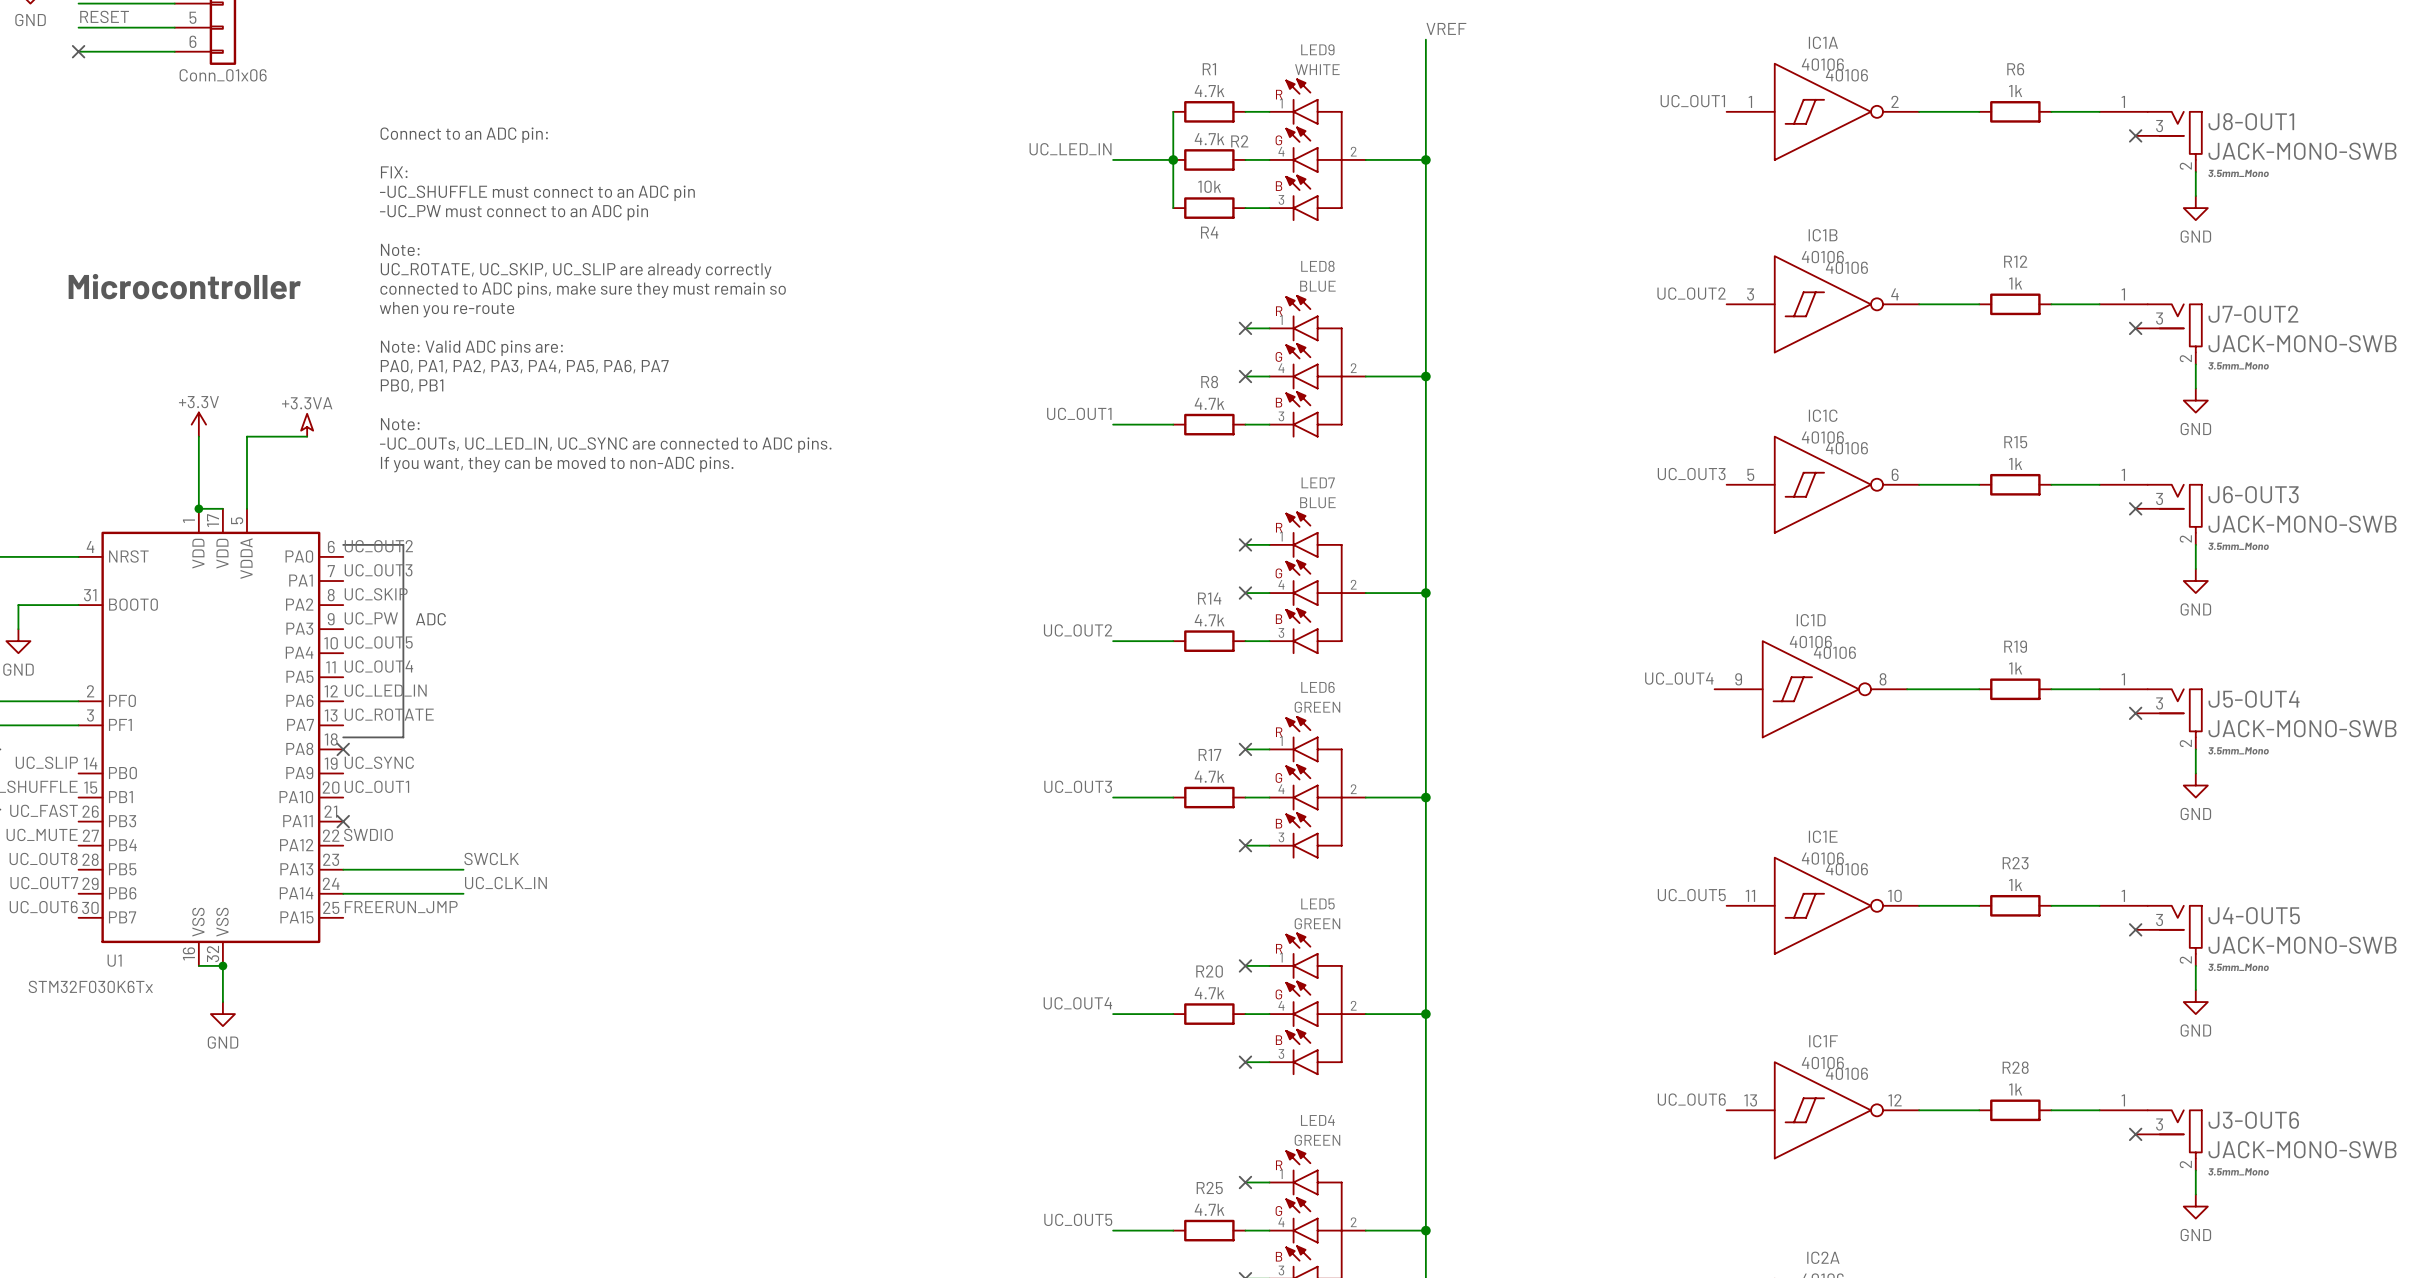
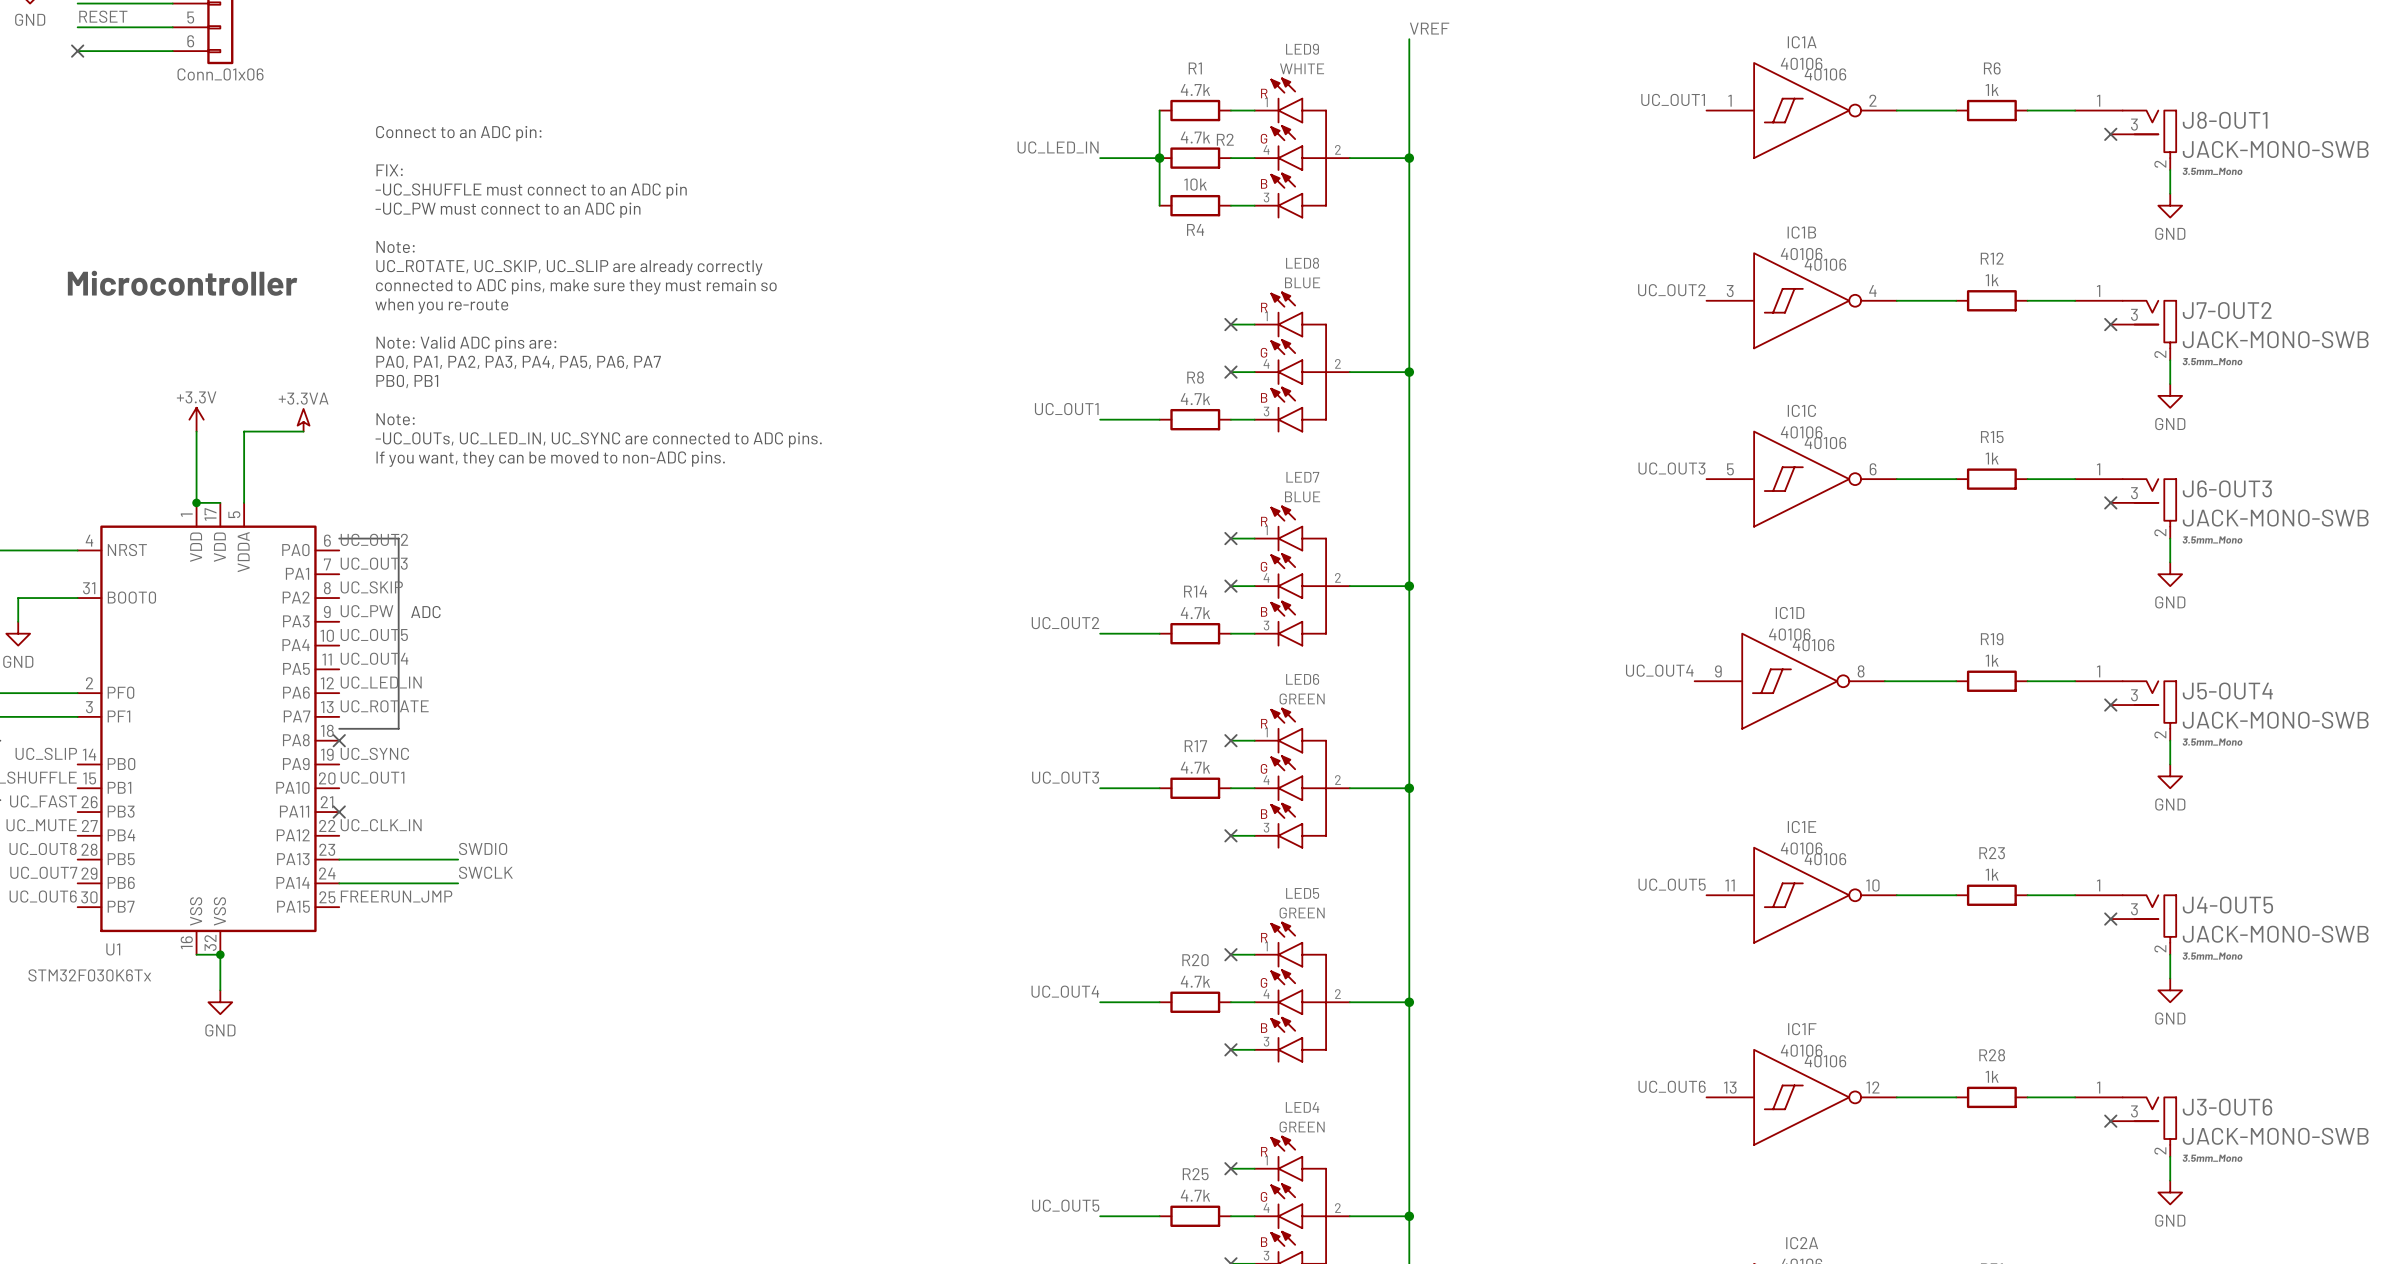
label: SWDIO (368, 834) -> UC_CLK_IN (381, 825)
label: SWCLK (491, 858) -> SWDIO (483, 848)
label: UC_CLK_IN (505, 883) -> SWCLK (485, 872)

